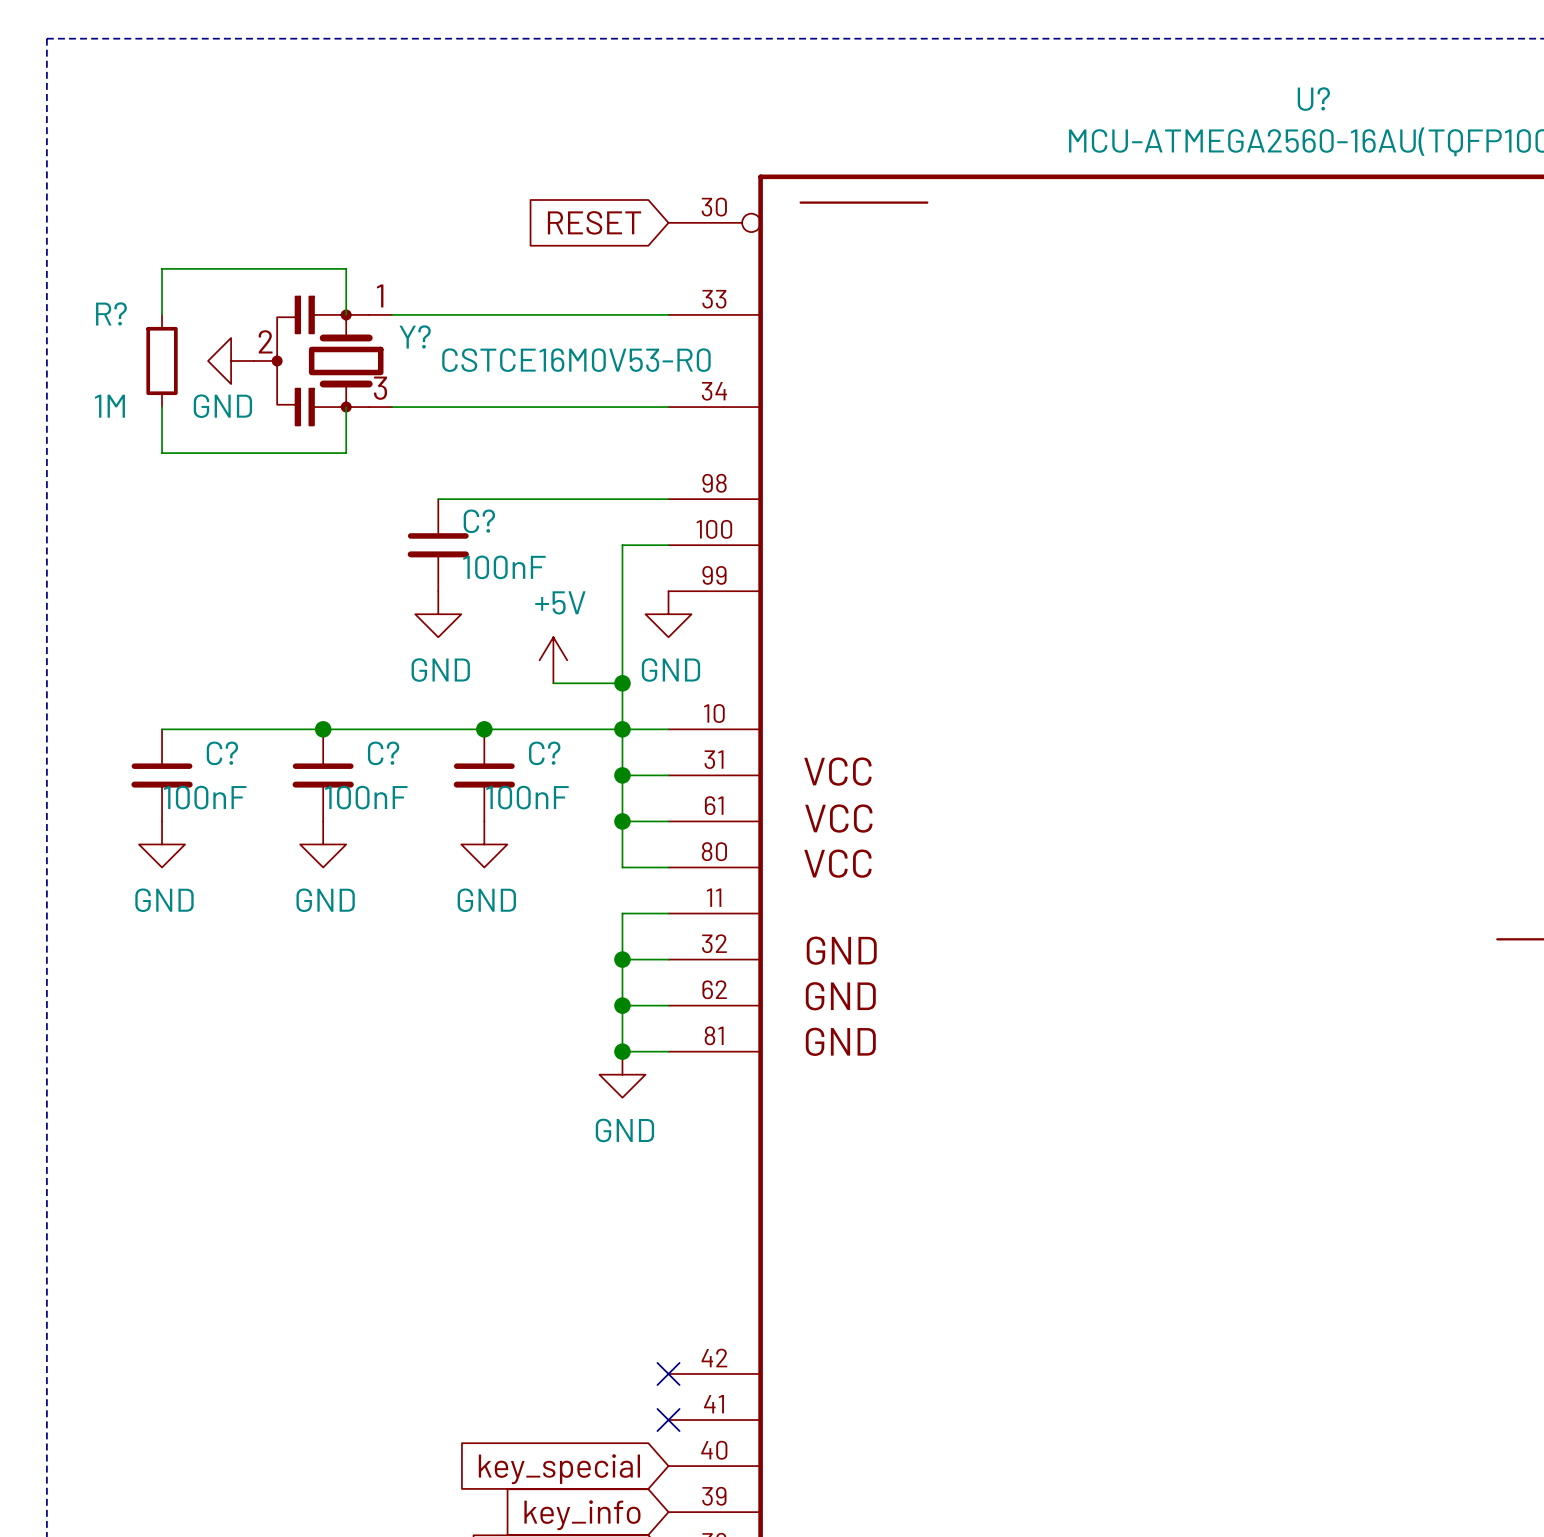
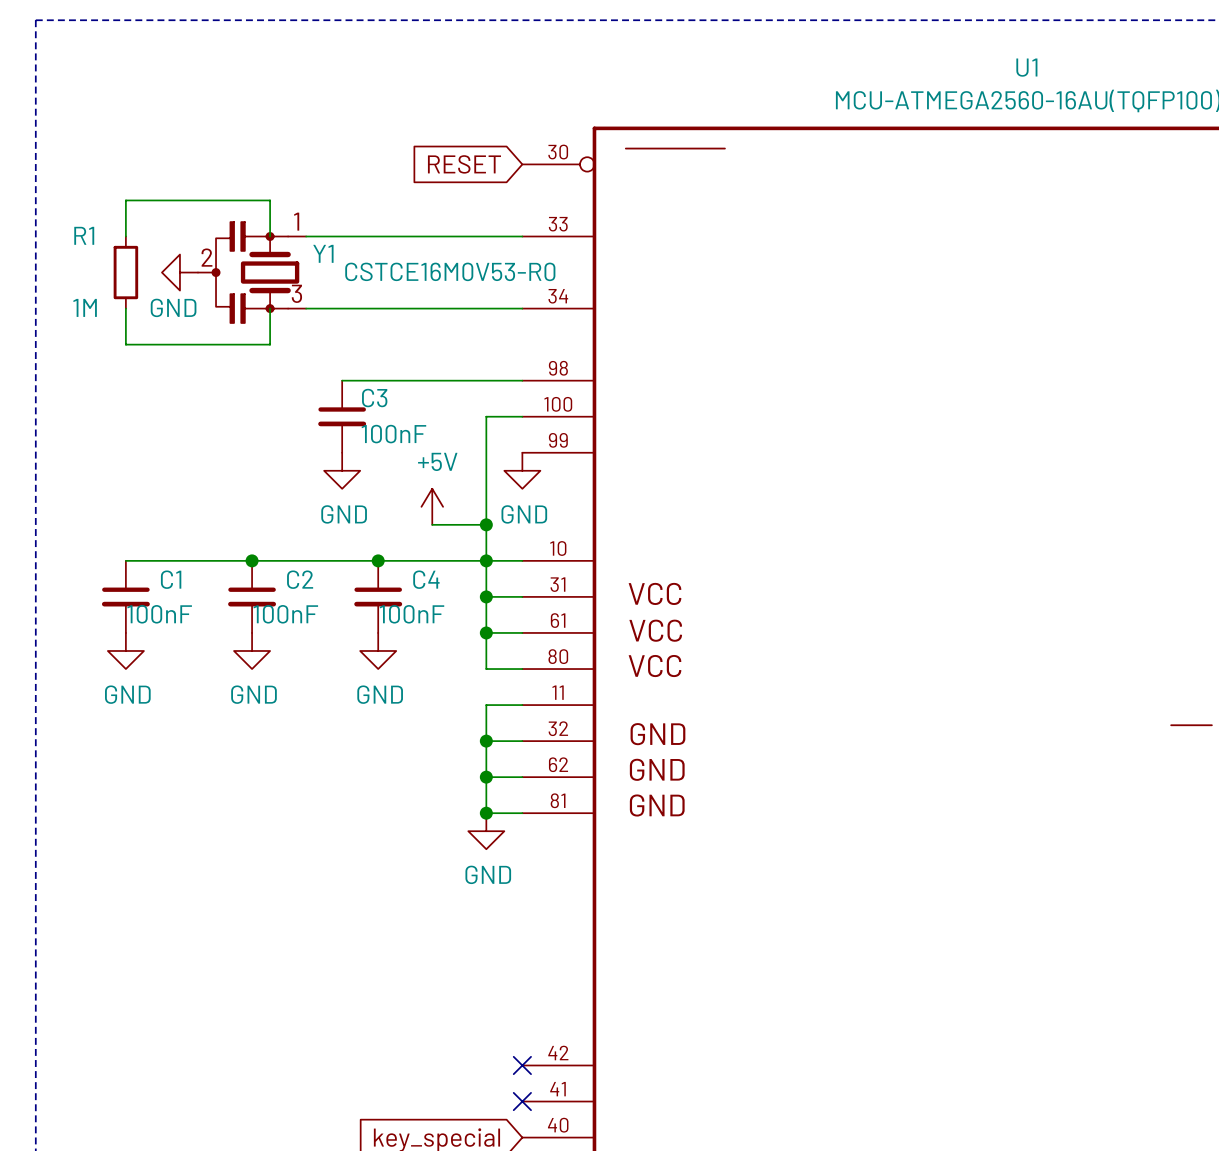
U? name: U? (1313, 99) -> U1 (1026, 67)
R? name: R? (111, 313) -> R1 (84, 235)
Y? name: Y? (415, 336) -> Y1 (323, 253)
C? name: C? (479, 521) -> C3 (374, 398)
C? name: C? (222, 753) -> C1 (171, 579)
C? name: C? (383, 753) -> C2 (300, 579)
C? name: C? (544, 753) -> C4 (426, 579)

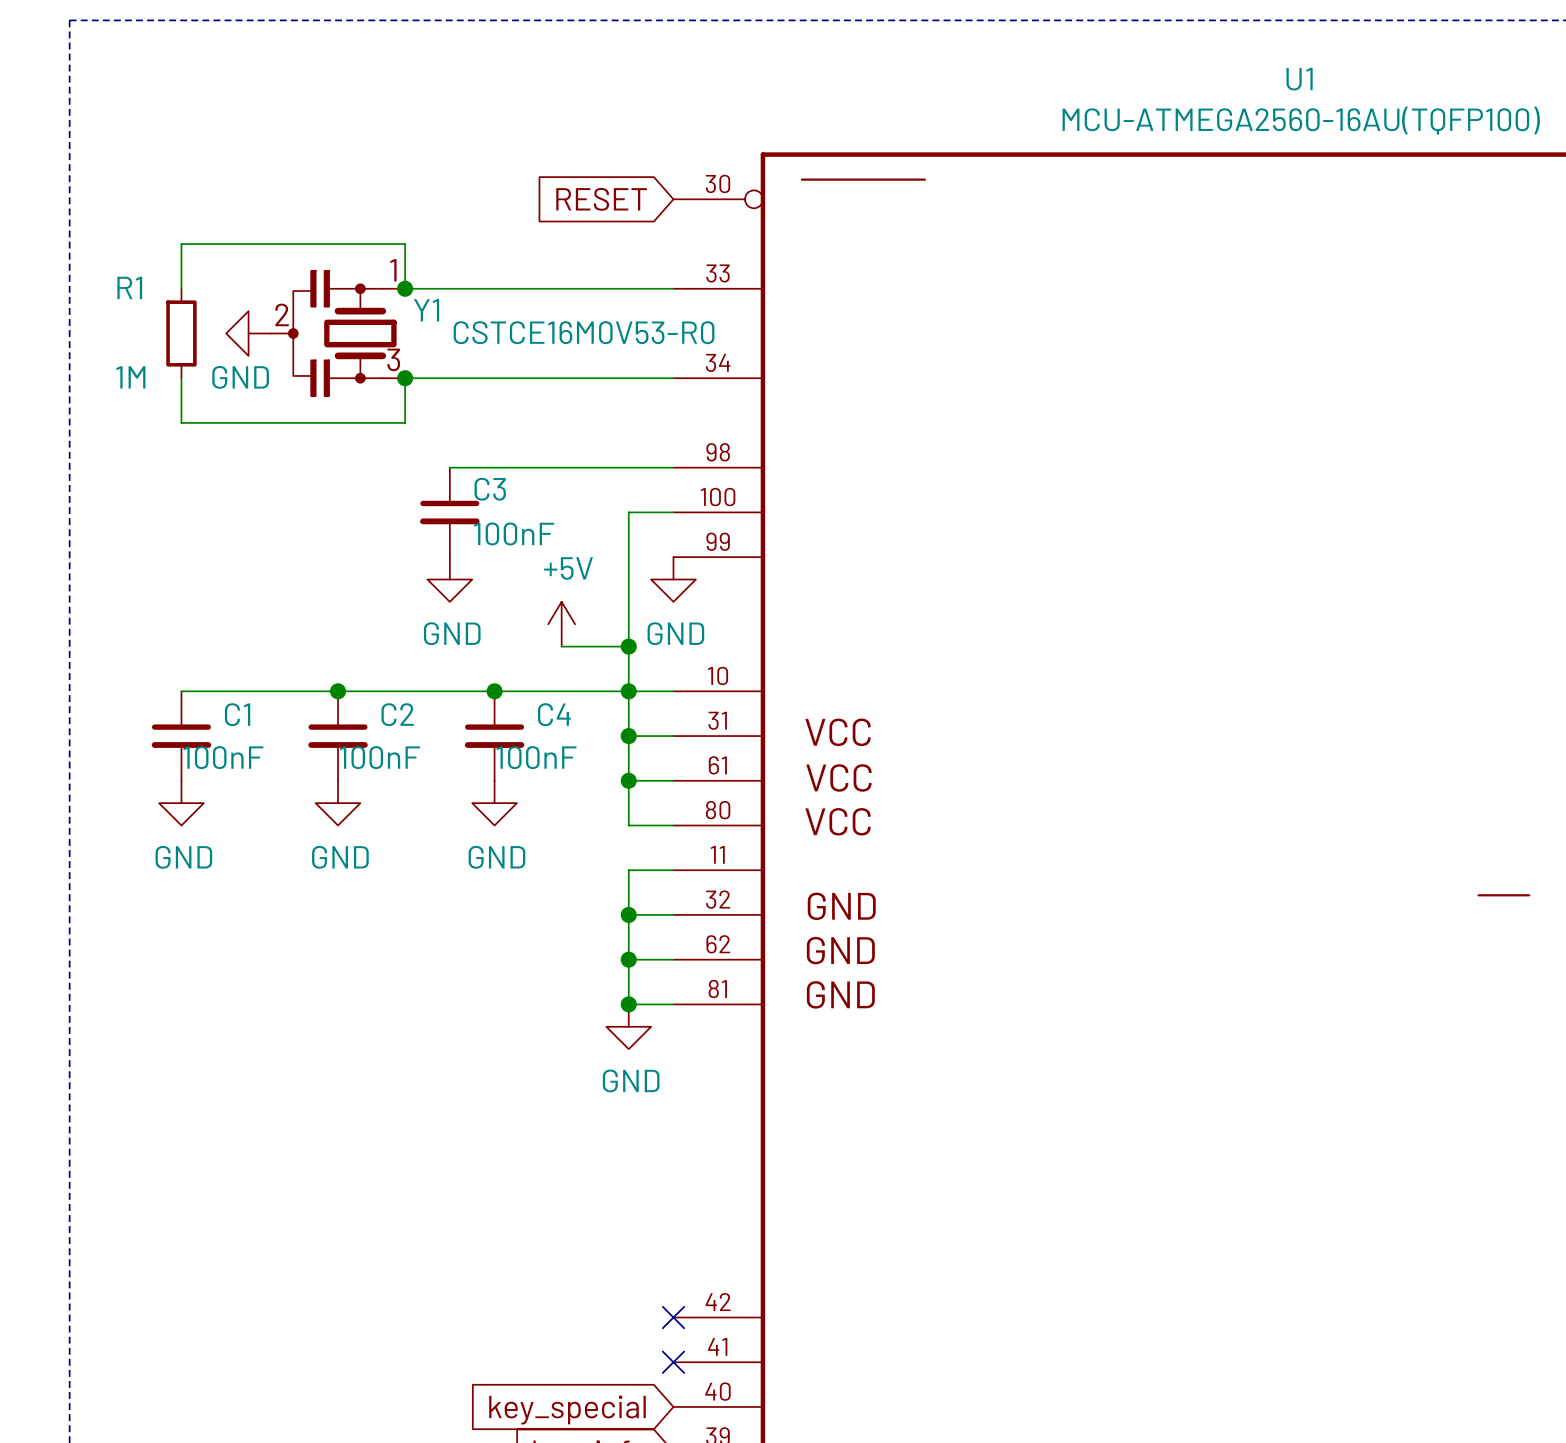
wire: (270, 200) (270, 236) -> (360, 244) (405, 244) (405, 288)
junction: none -> (405, 288)
wire: (270, 308) (270, 344) -> (405, 378) (405, 422) (360, 422)
junction: none -> (405, 378)

